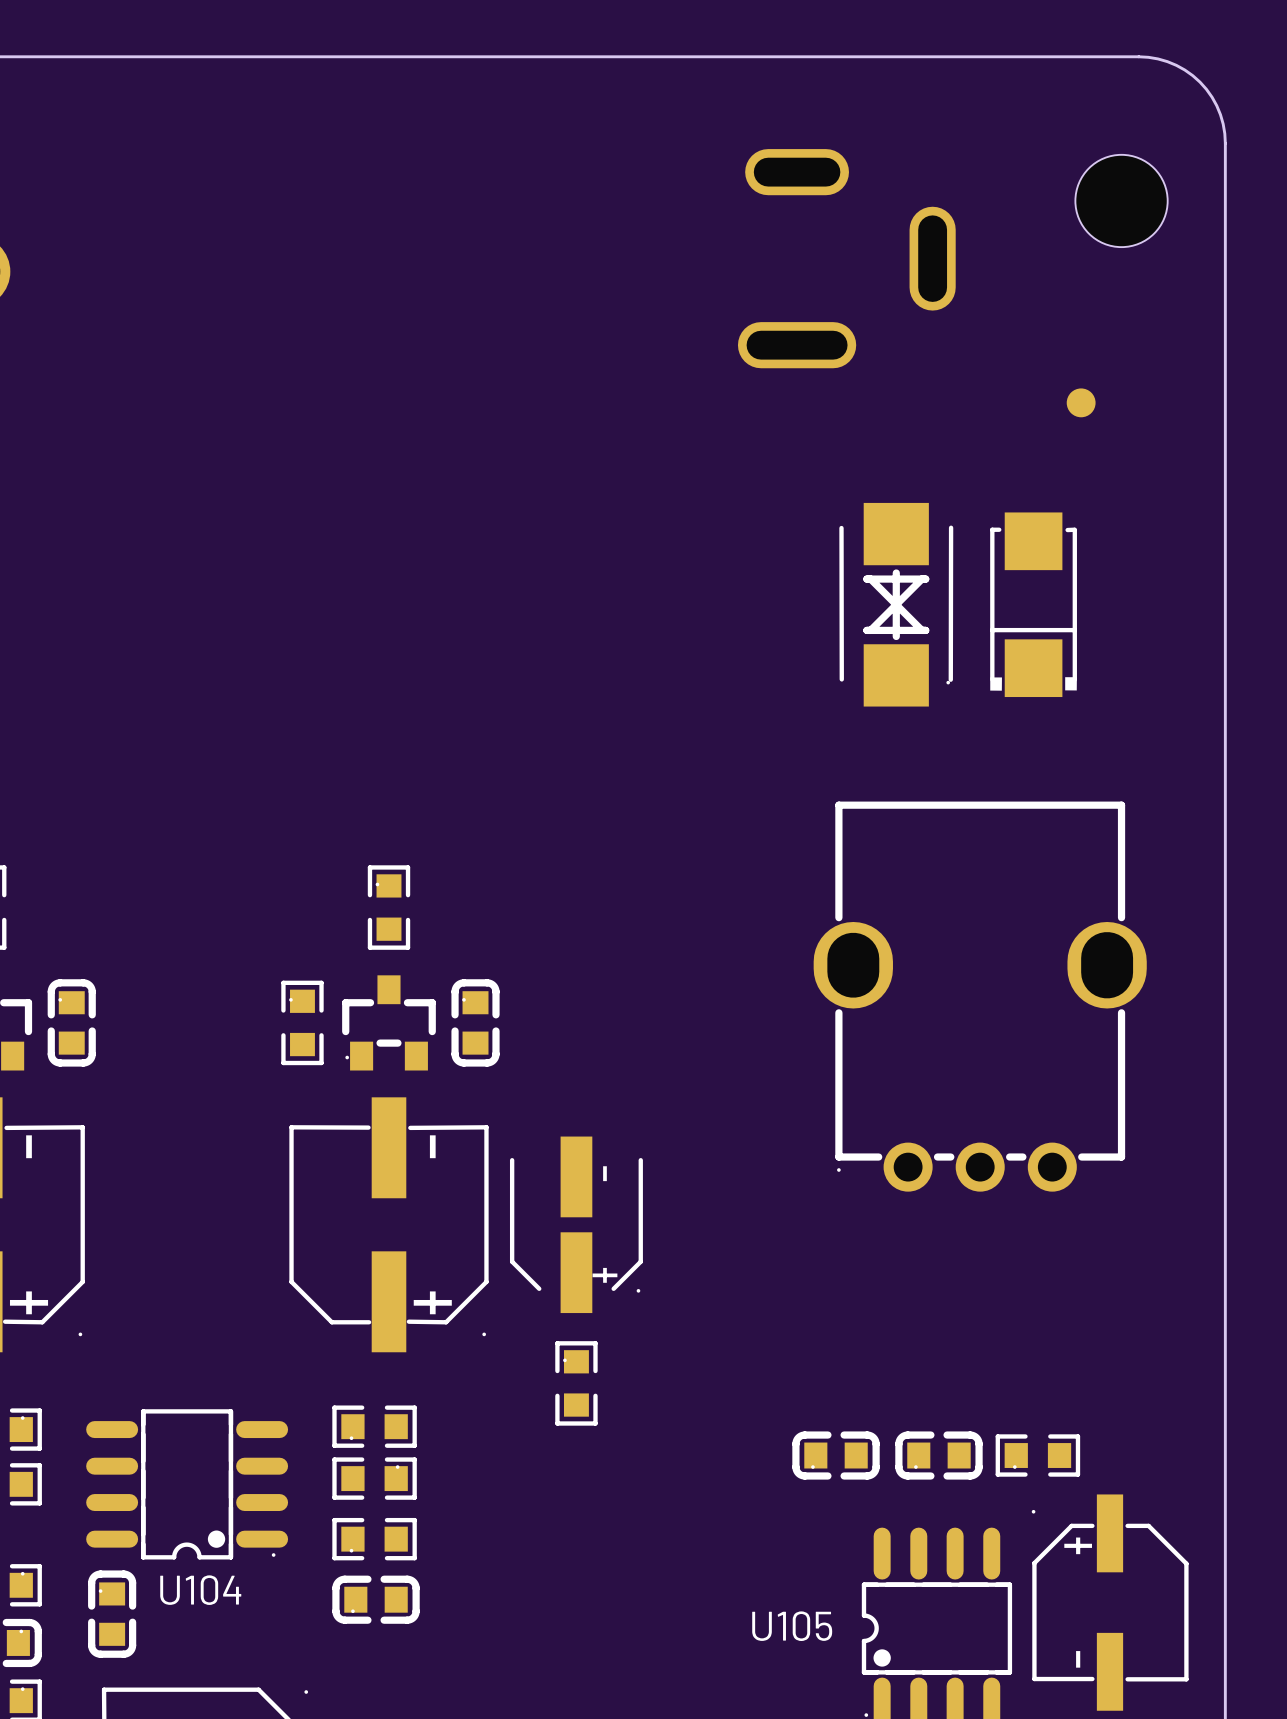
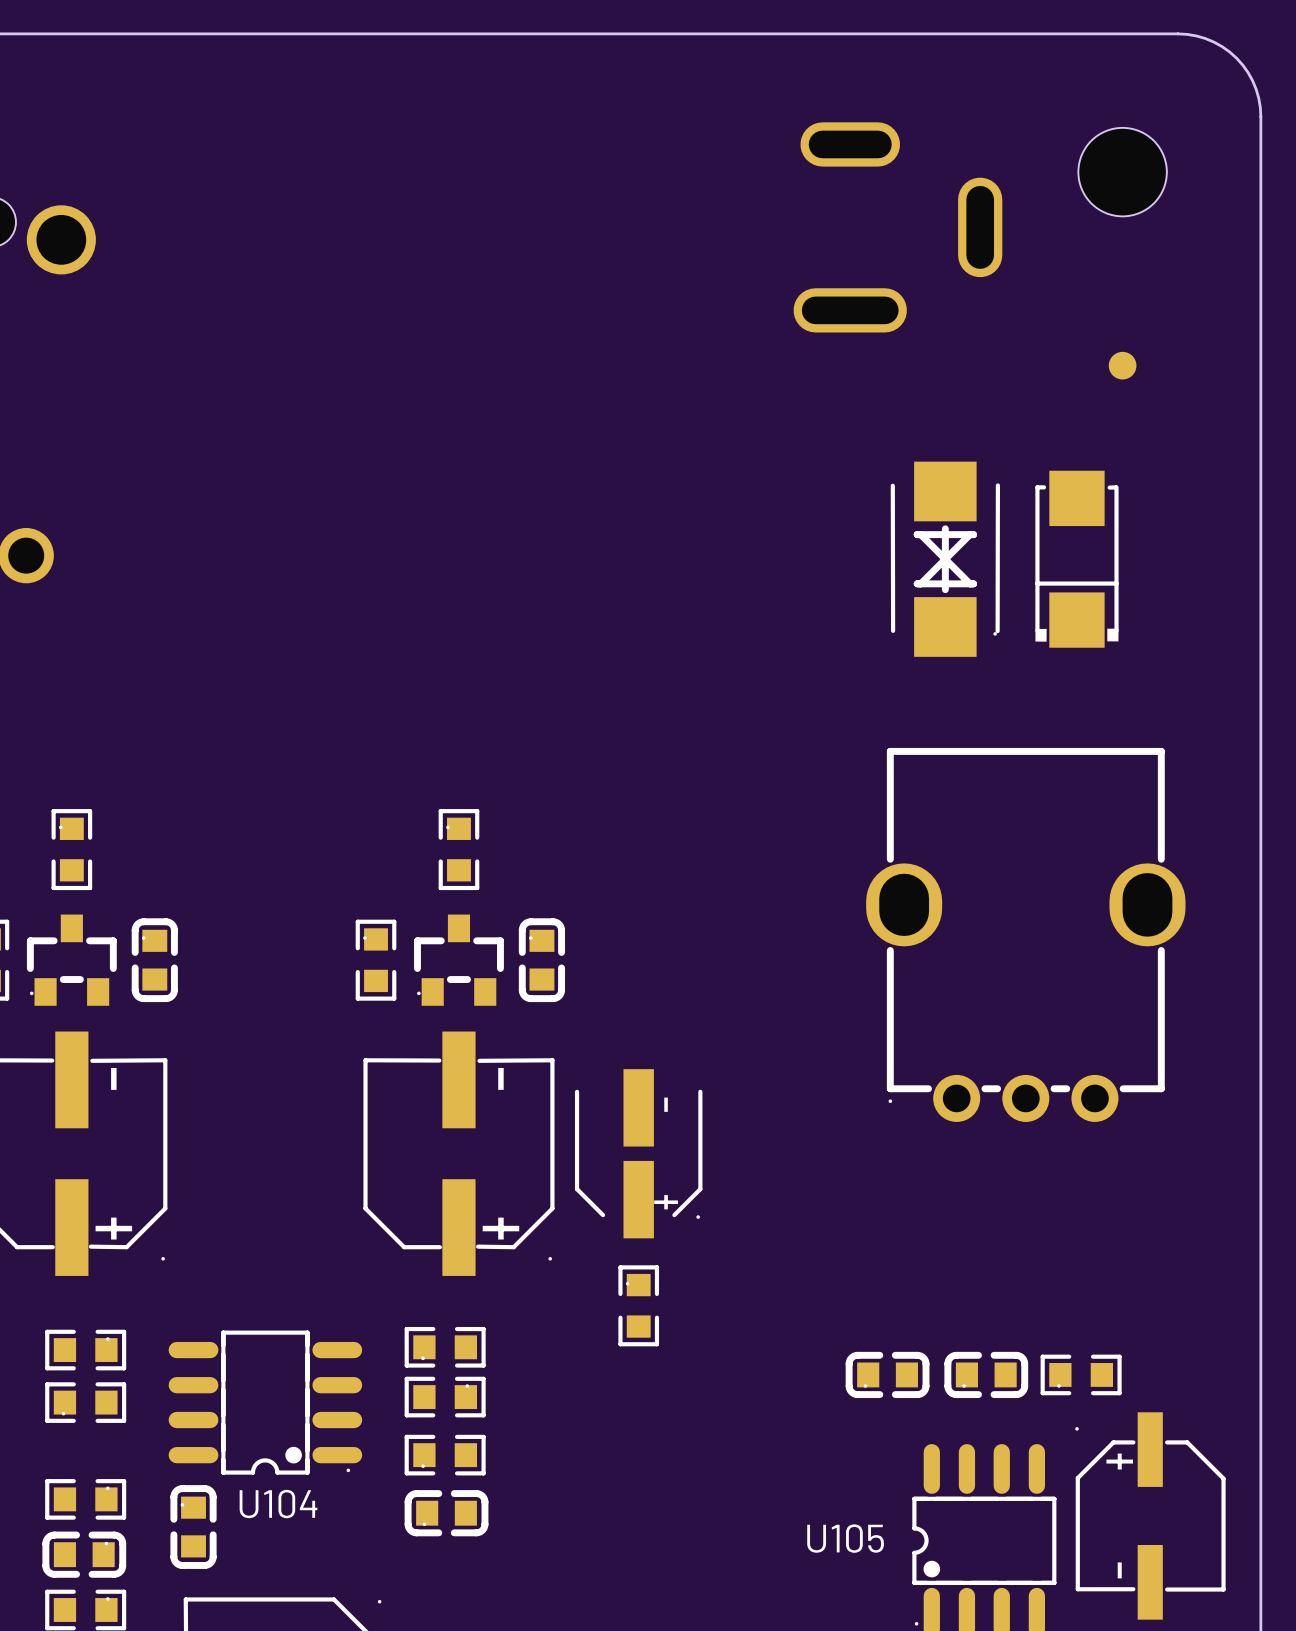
part position: (1121, 200) -> (1122, 172)

